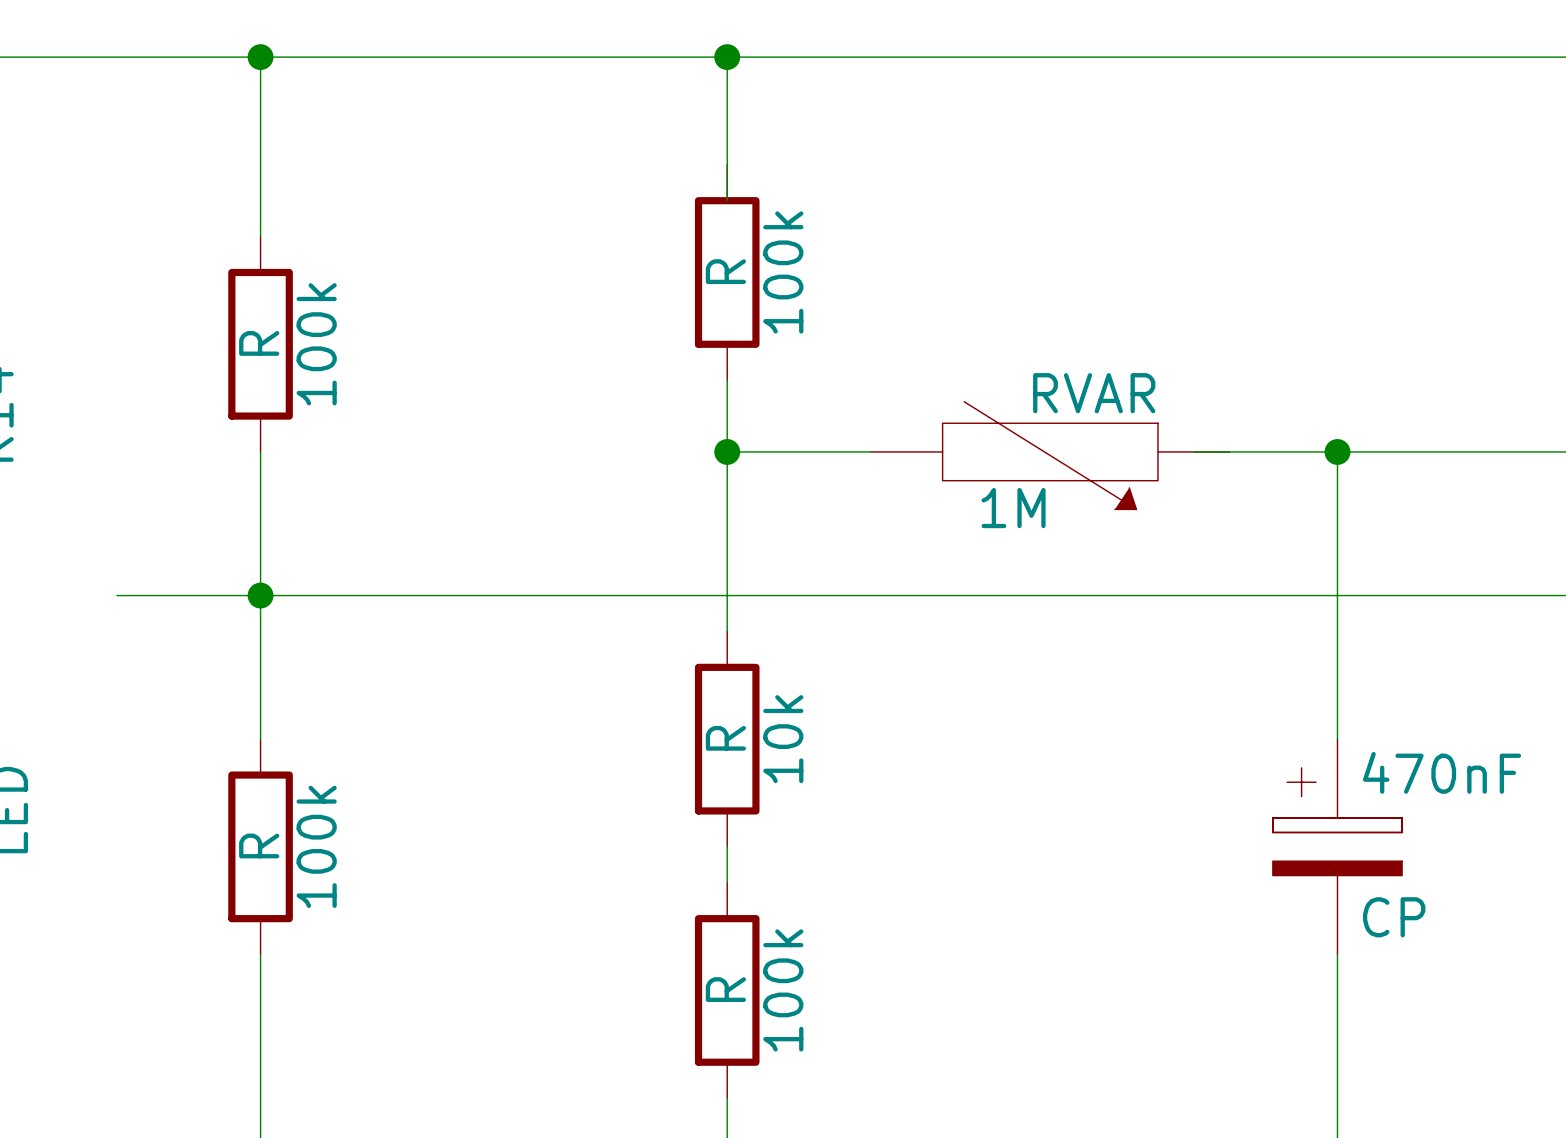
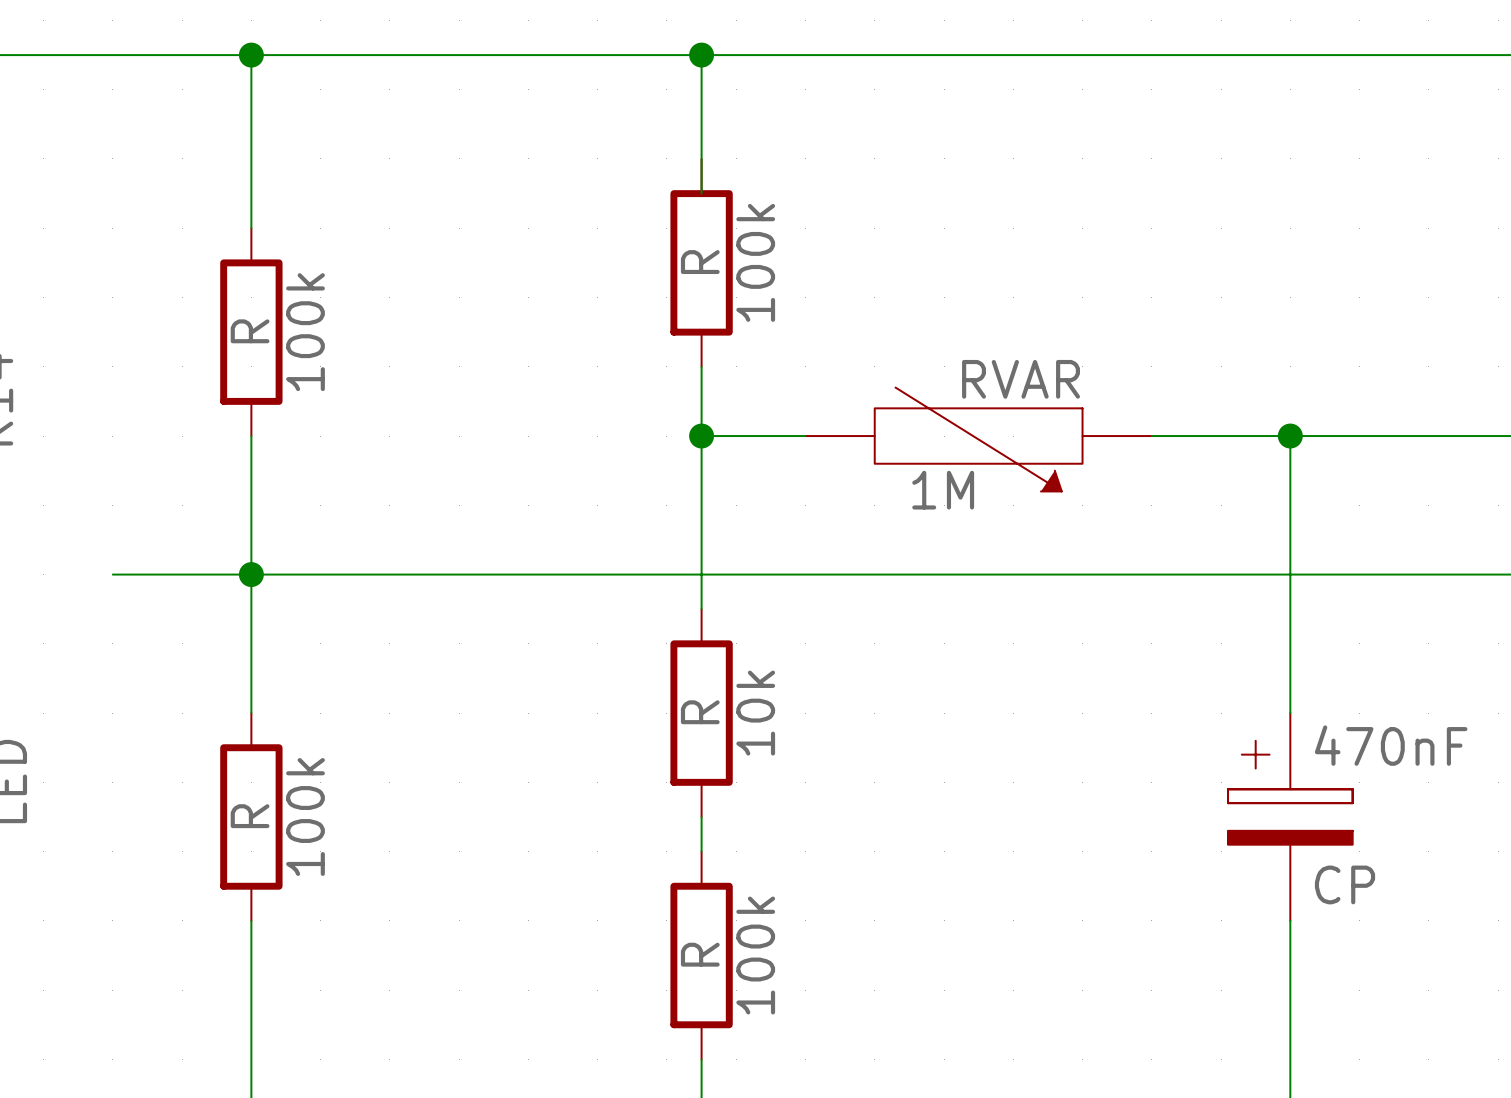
1M position: (1050, 455) -> (978, 439)

